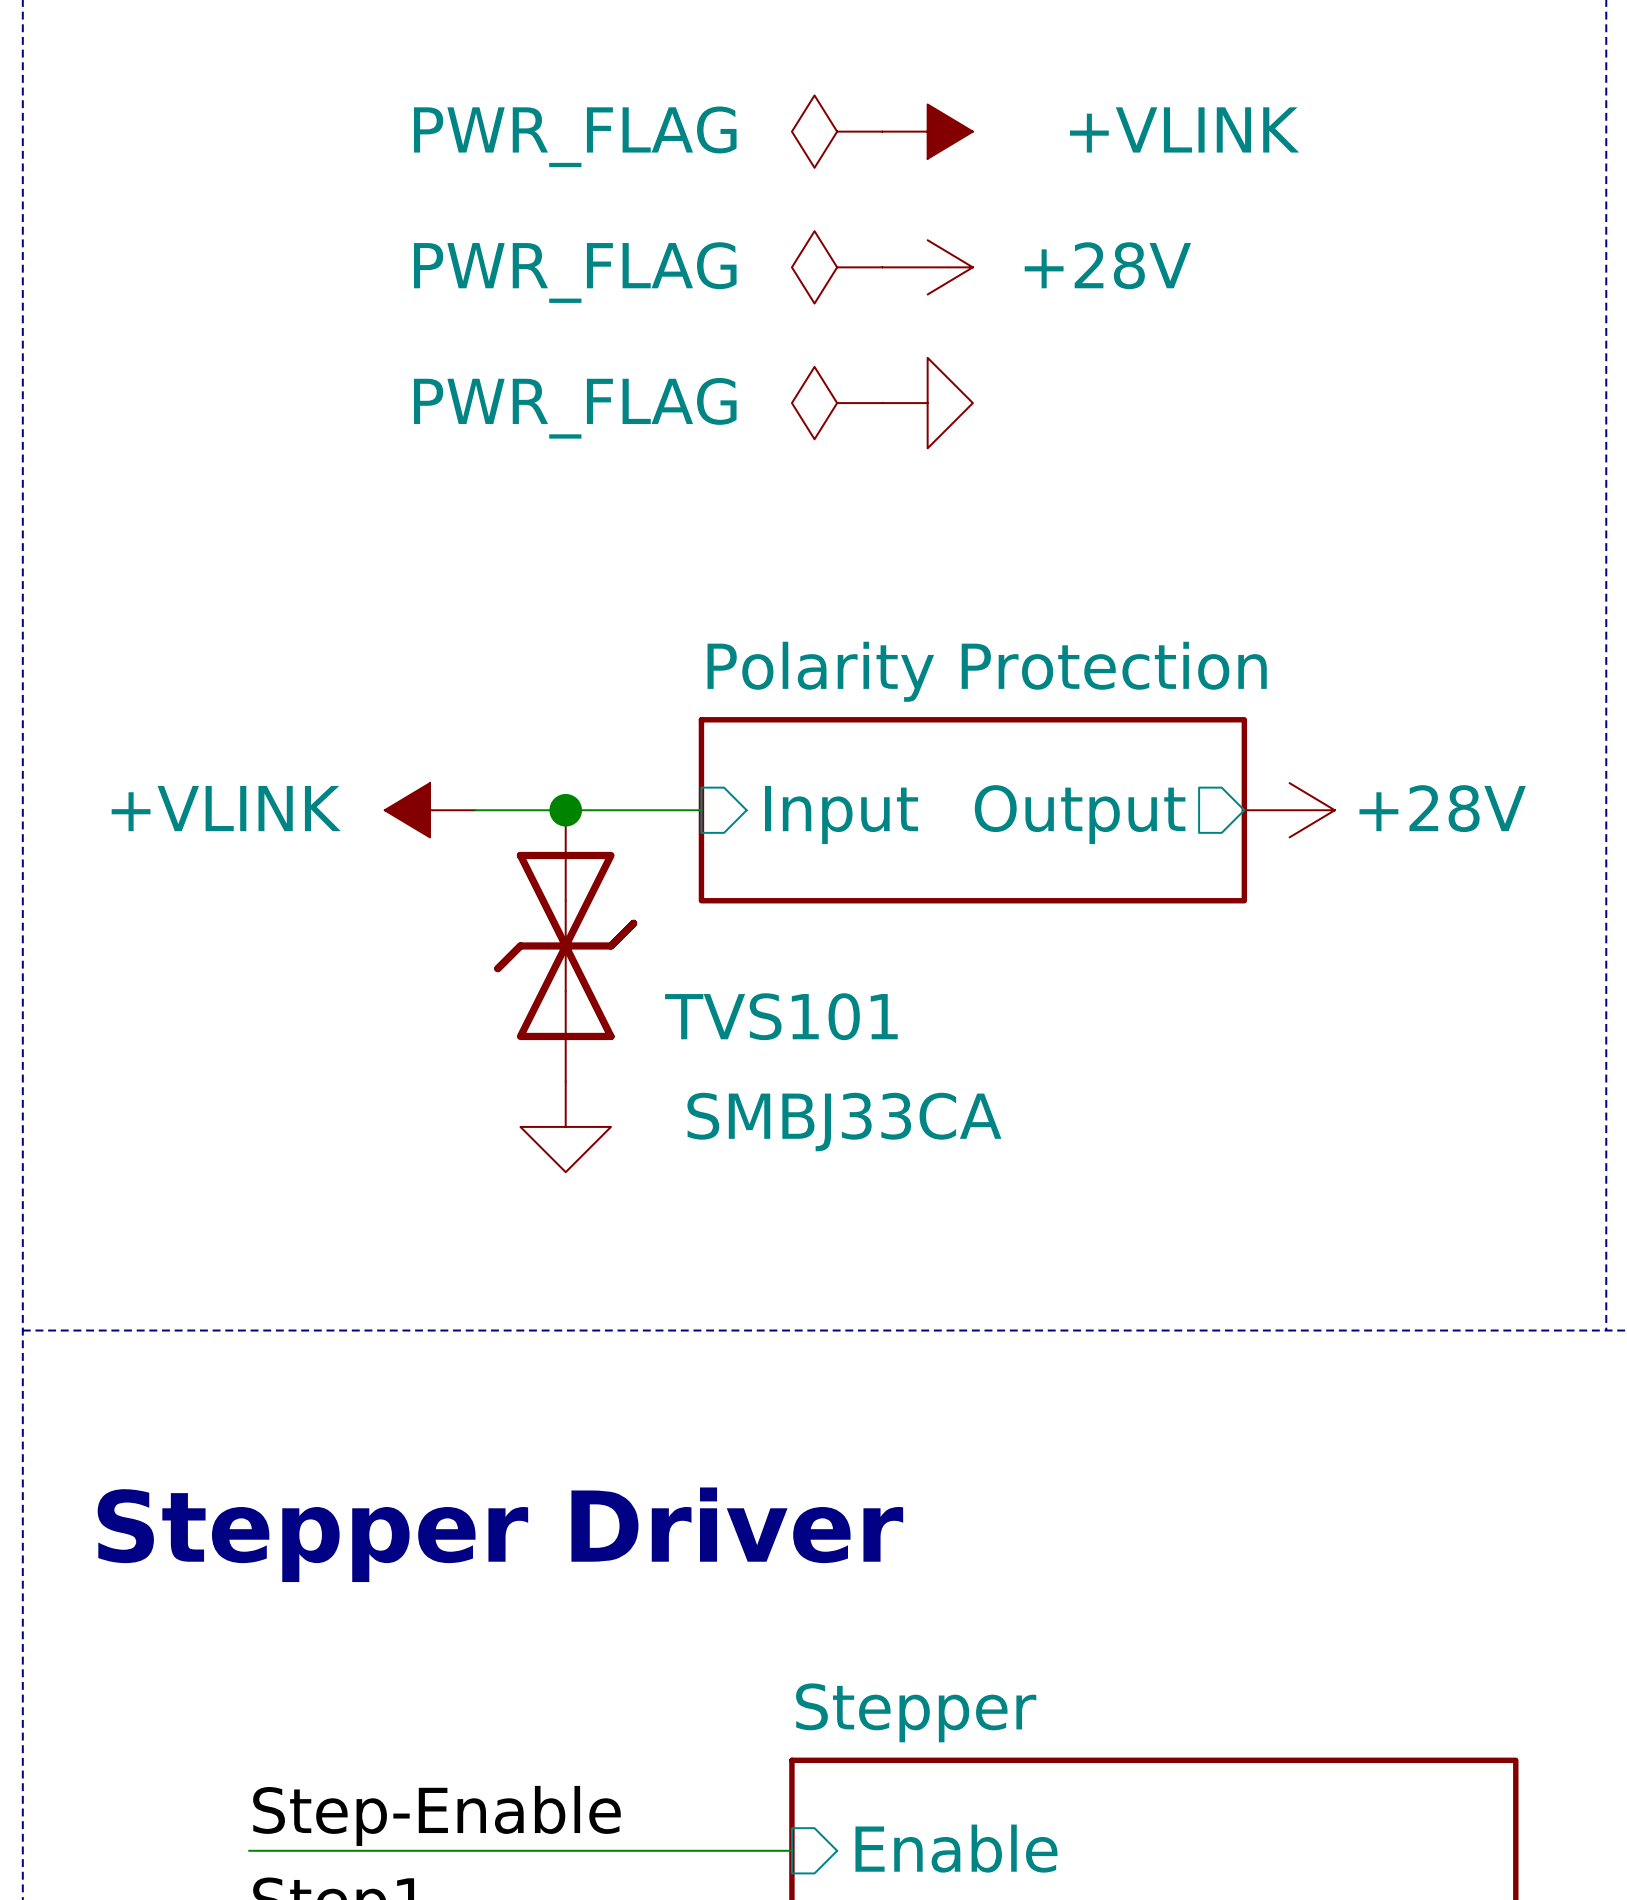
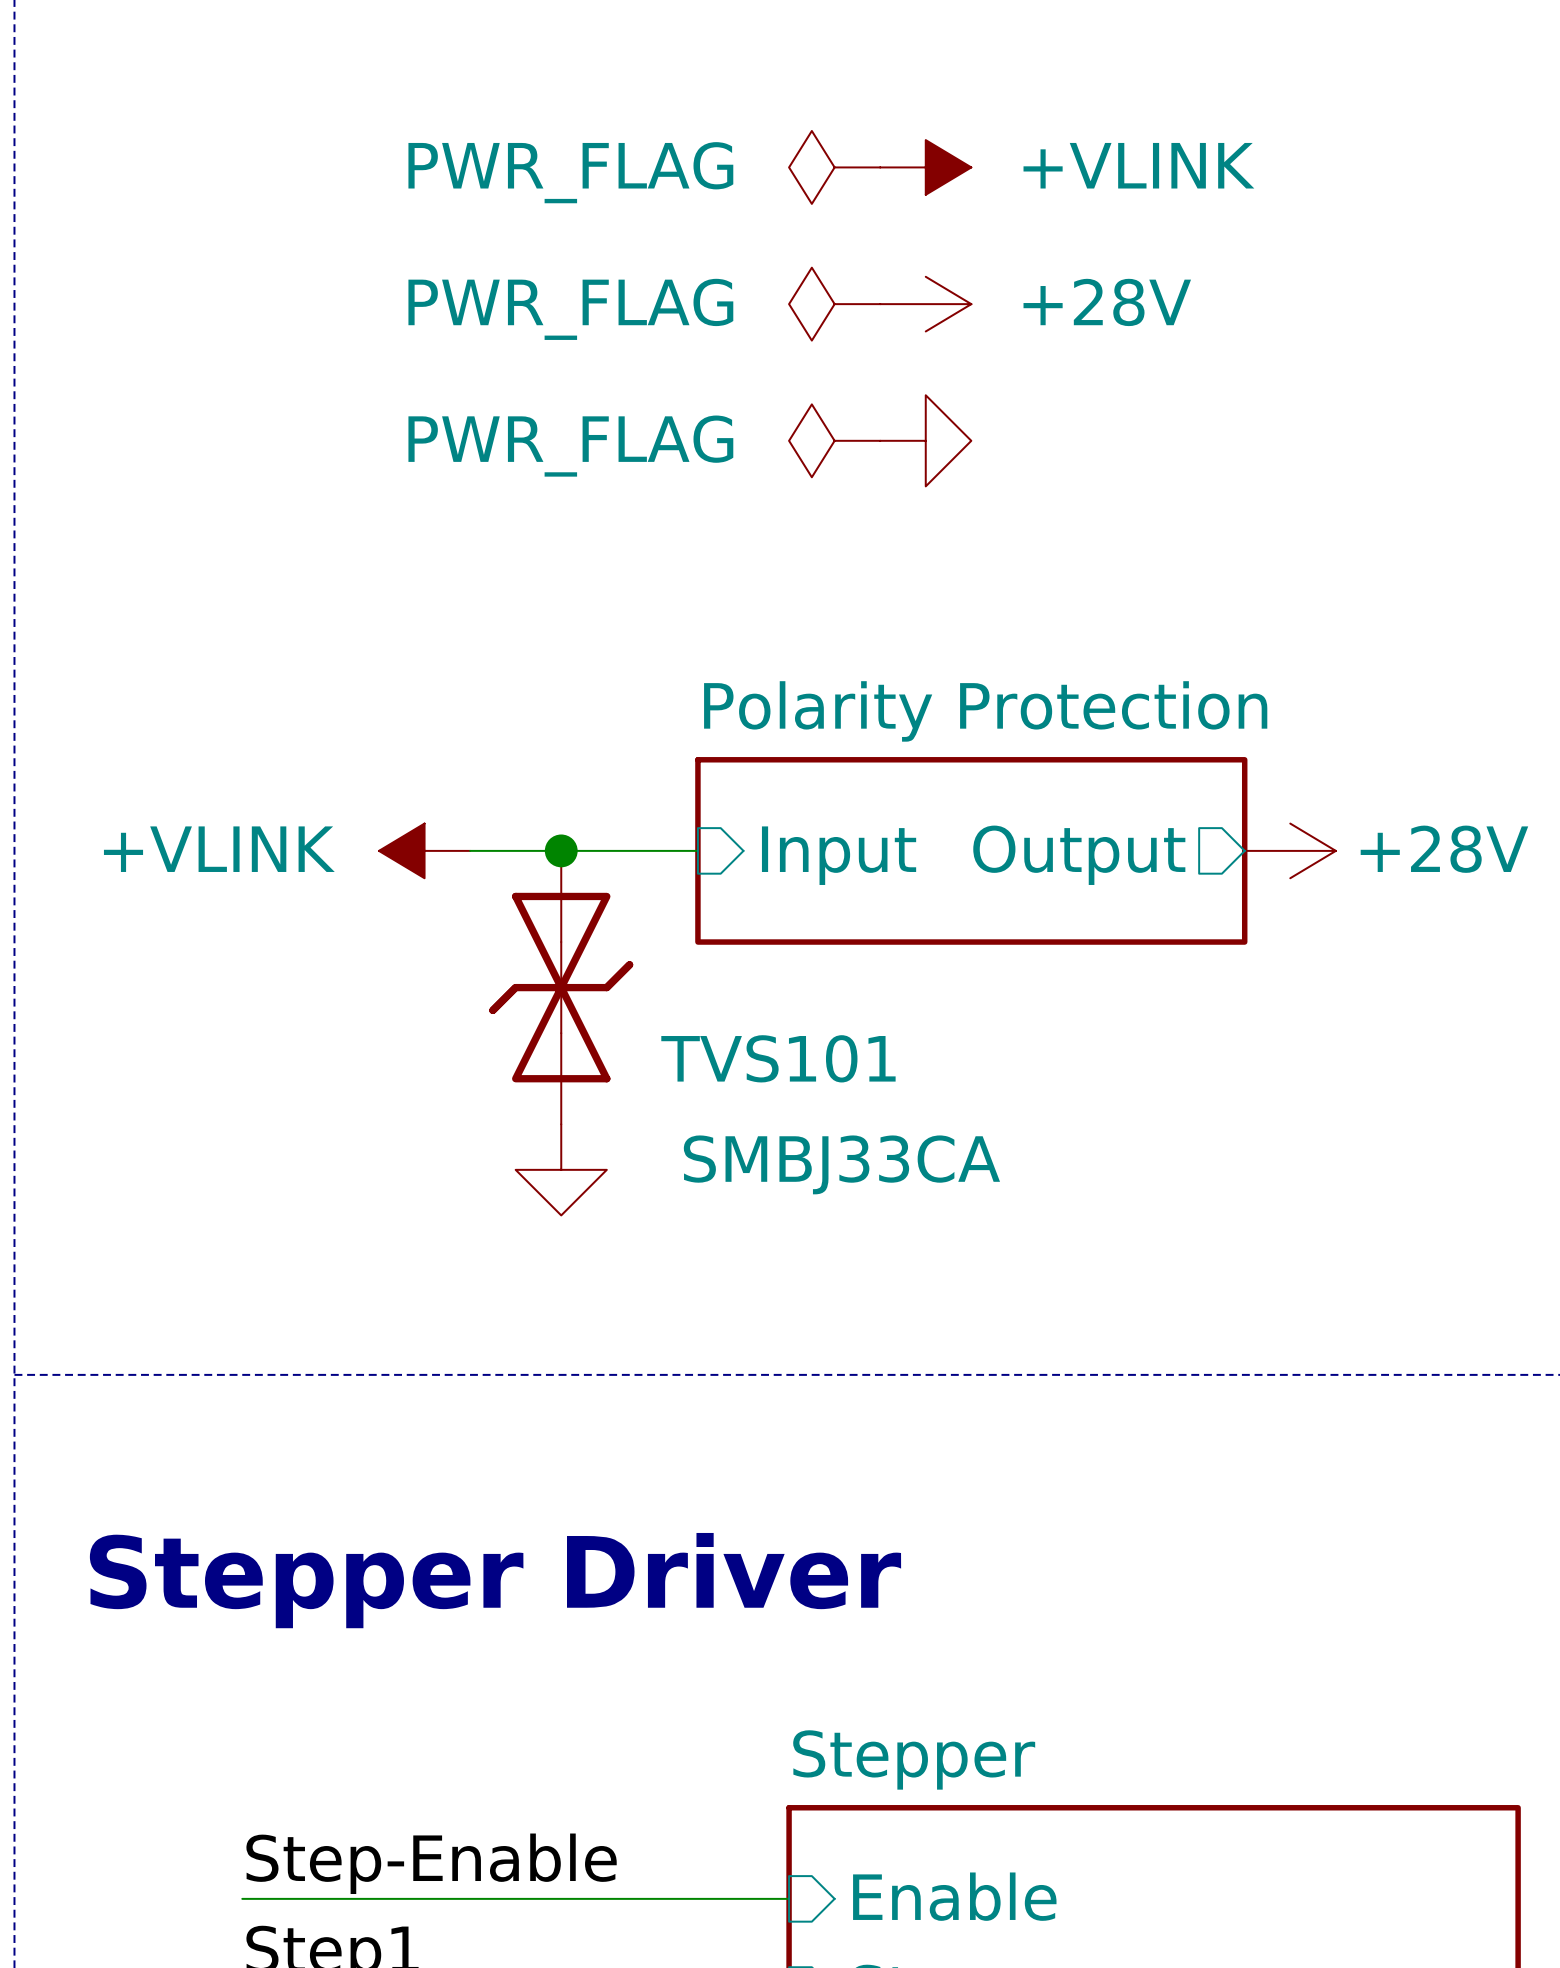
power symbol text position: +VLINK (1184, 129) -> +VLINK (1138, 165)

